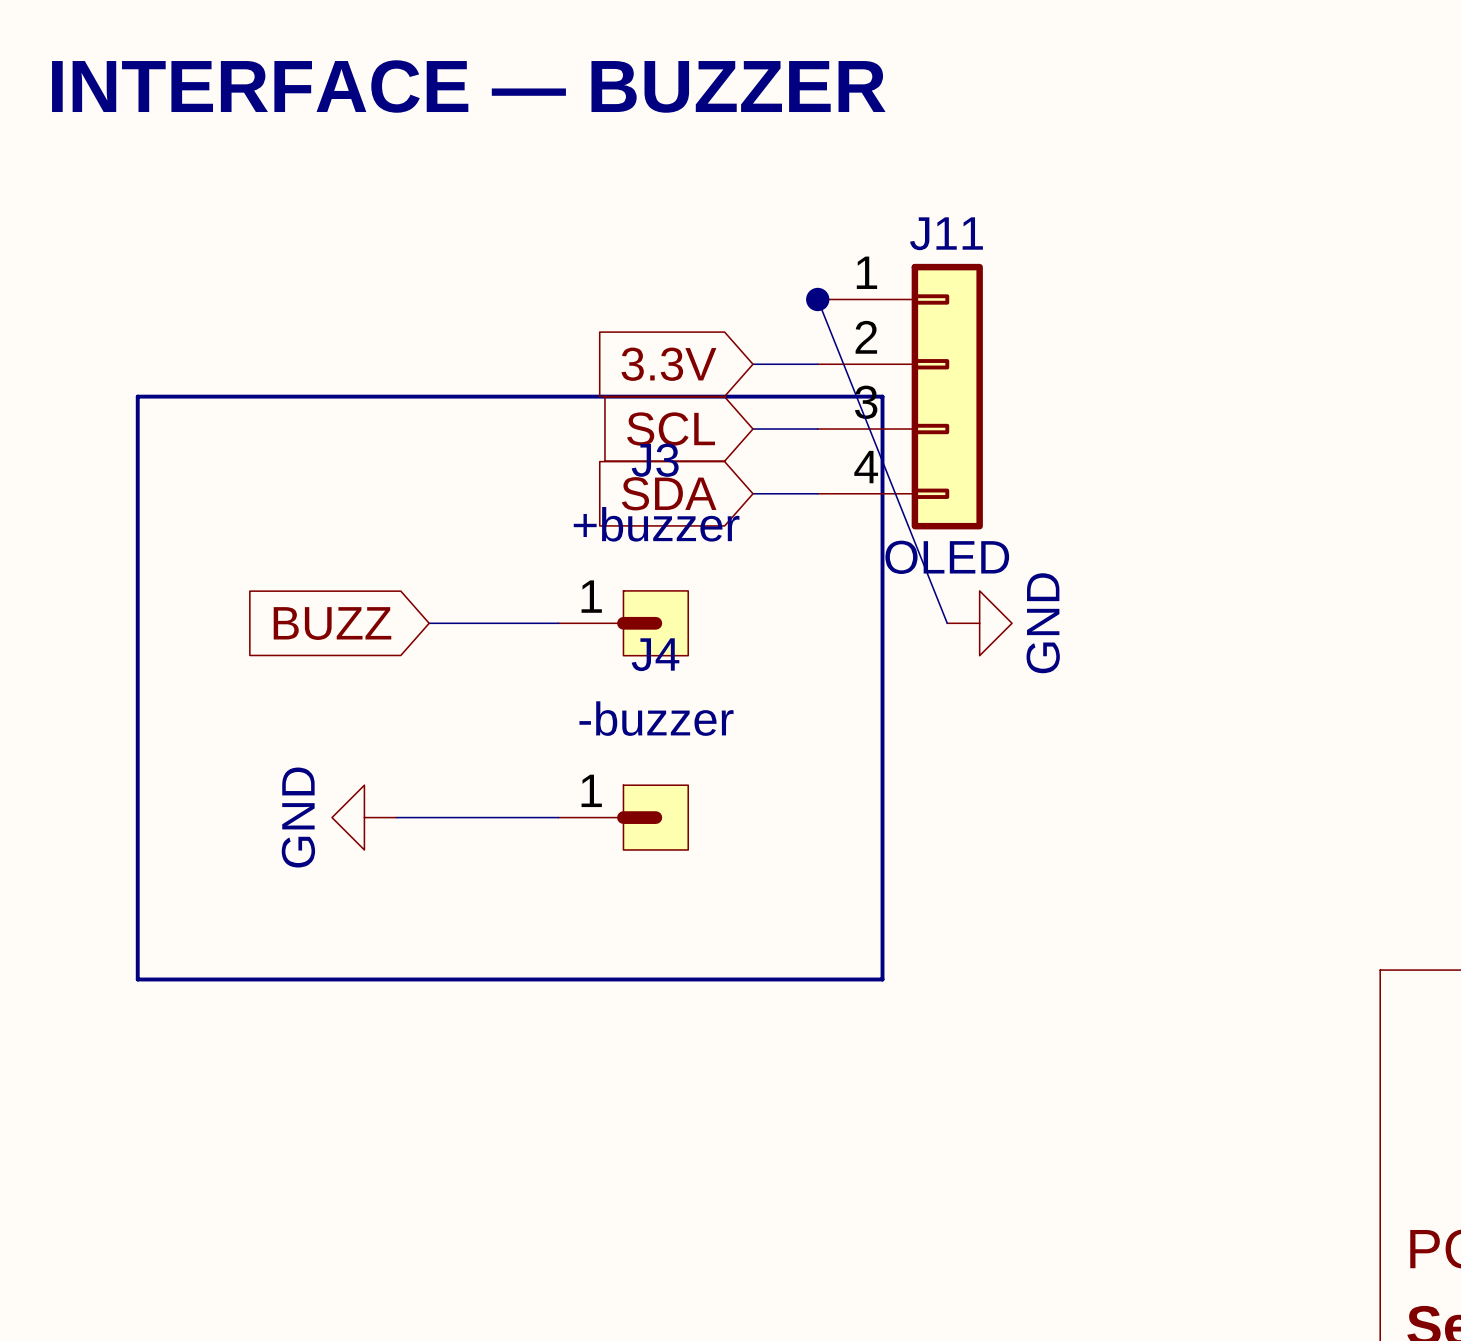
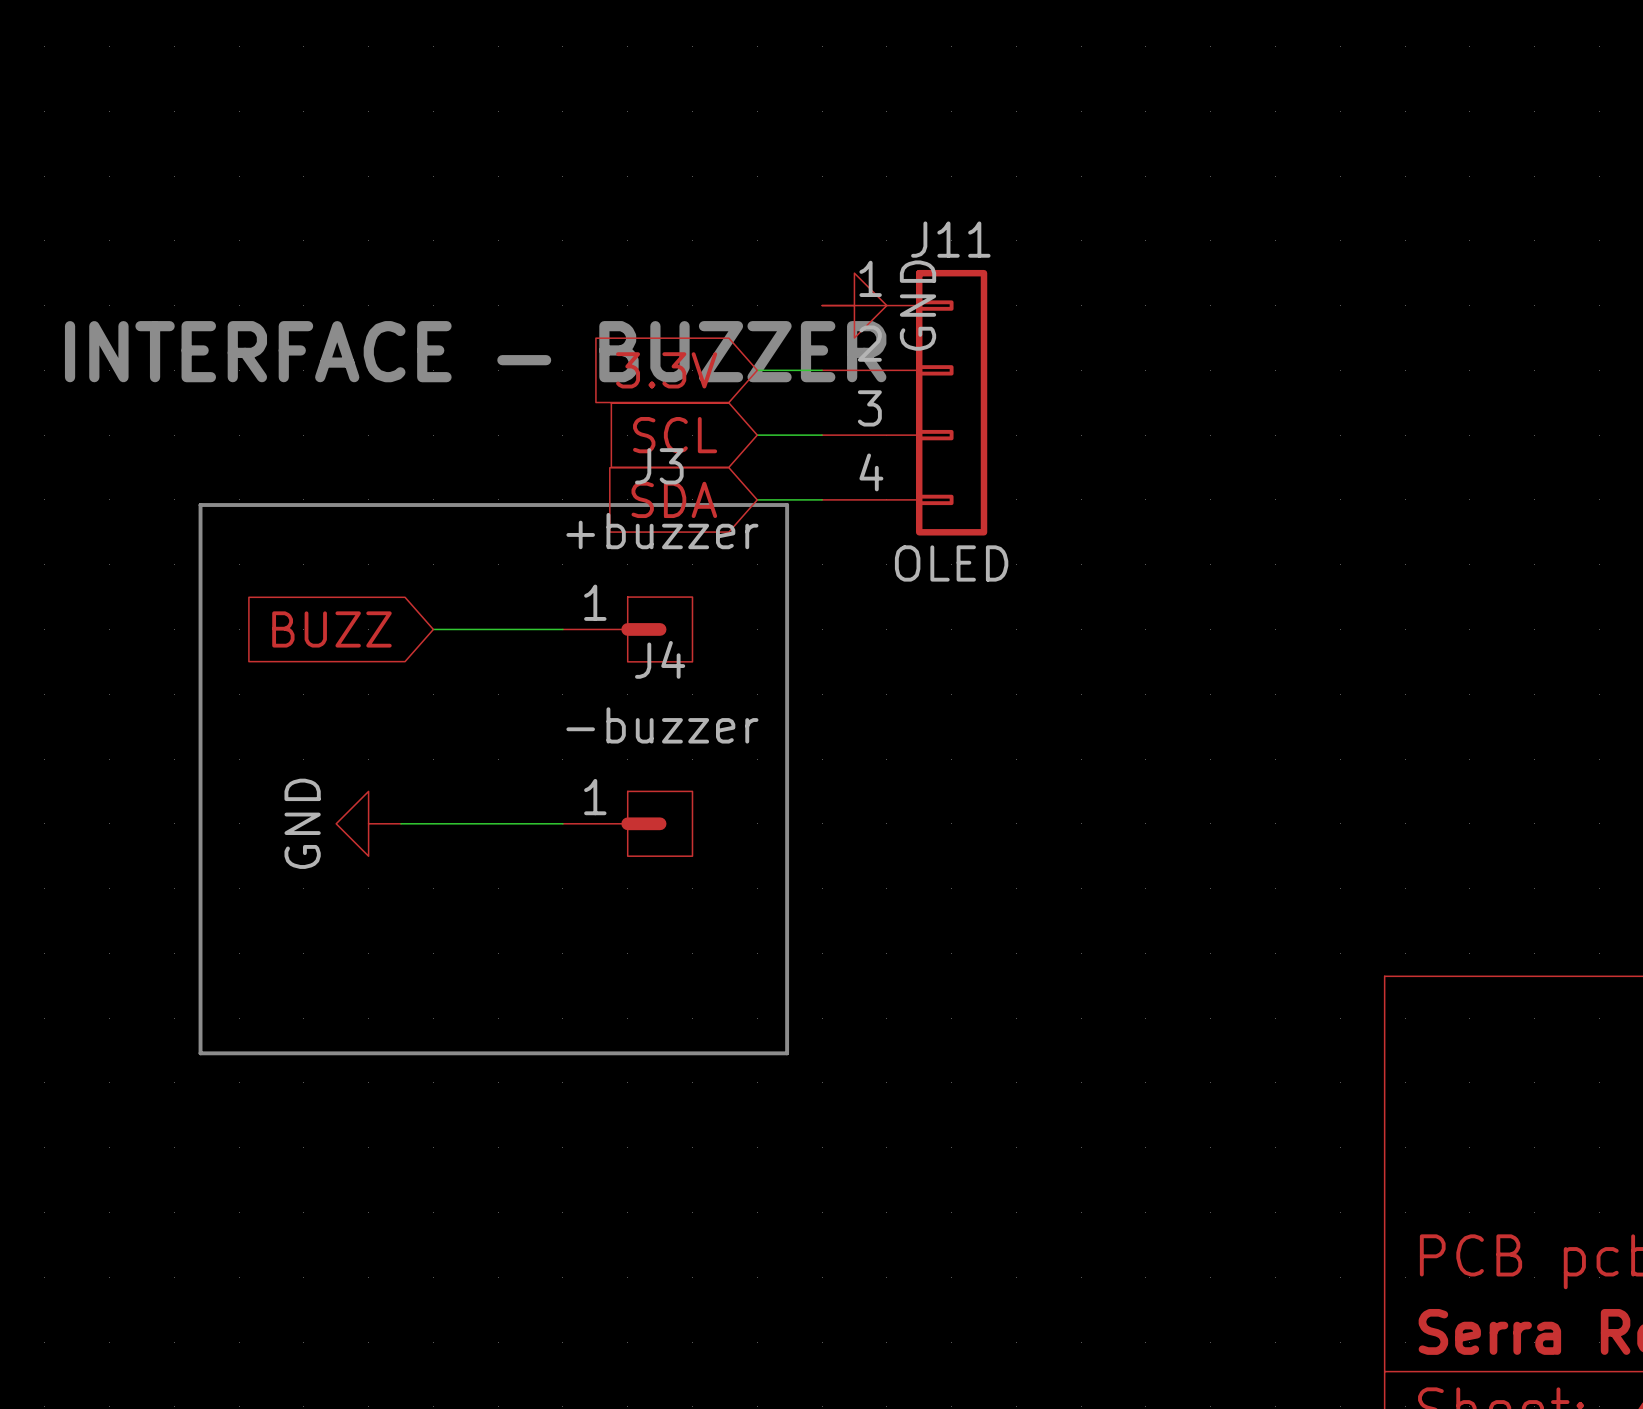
text position: INTERFACE — BUZZER (468, 86) -> INTERFACE — BUZZER (475, 351)
wire: (817, 299) (947, 623) -> none
junction: (817, 299) -> none
line: (137, 396) (882, 396) (882, 979) (137, 979) (137, 396) -> (200, 505) (200, 1053) (787, 1053) (787, 505) (200, 505)
power symbol position: GND (979, 623) -> GND (854, 305)

